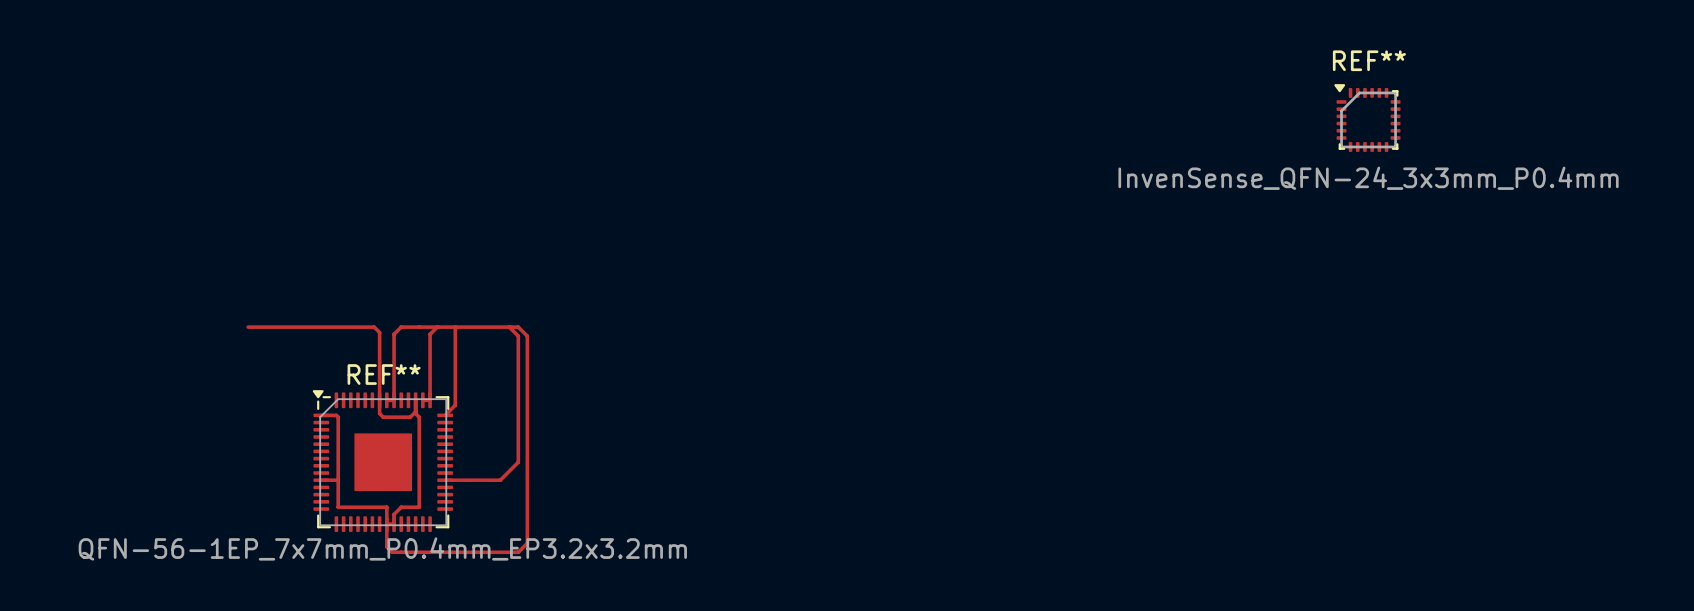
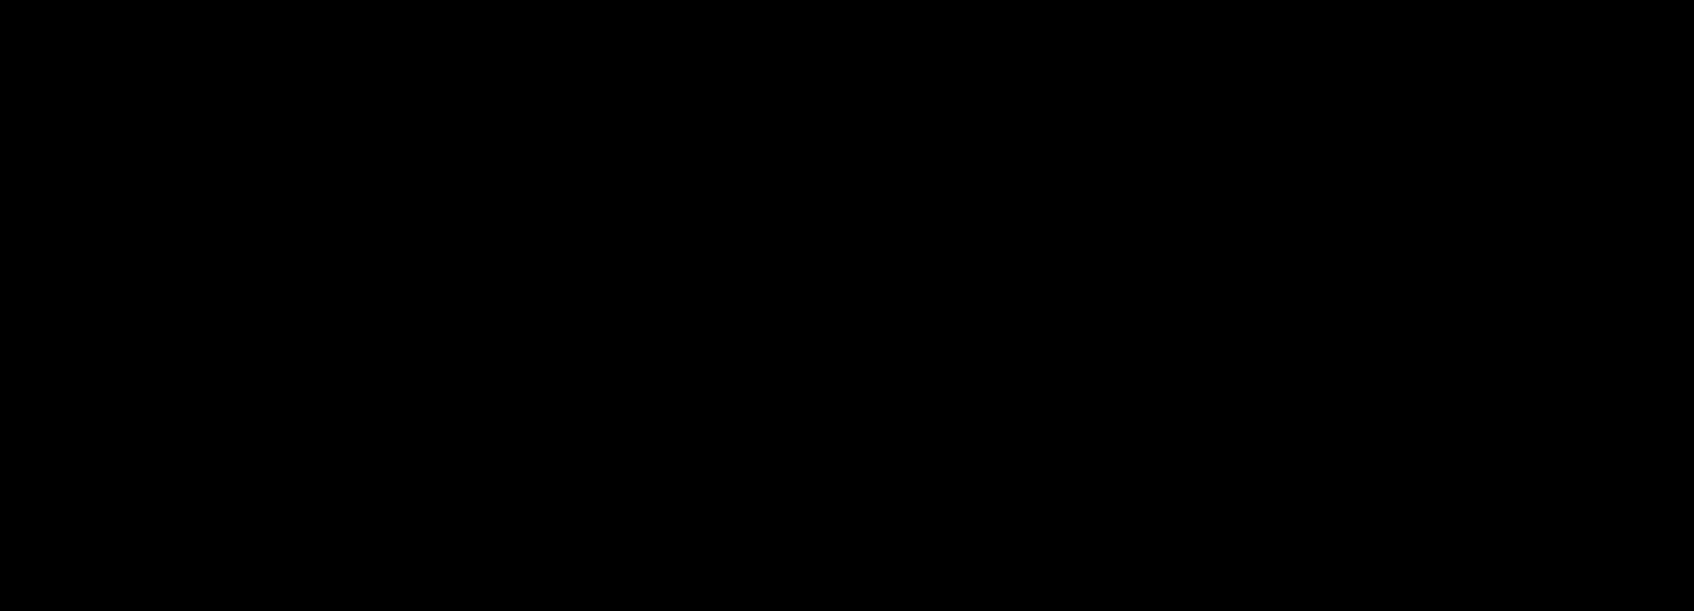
REF**: InvenSense_QFN-24_3x3mm_P0.4mm (1367, 118) -> none
track: (248, 327) (374, 327) (379, 332) (379, 413) (383, 417) (410, 417) (415, 411) -> none
track: (437, 327) (430, 334) (430, 400) (422, 400) -> none
track: (455, 327) (455, 405) (445, 415) -> none
track: (509, 327) (518, 336) (518, 462) (500, 480) (445, 480) -> none
track: (386, 400) (394, 400) (394, 334) (401, 327) (518, 327) (527, 336) (527, 543) (518, 552) (392, 552) (386, 546) (386, 507) (338, 507) (338, 417) (336, 415) (321, 415) -> none
track: (415, 400) (415, 413) (419, 417) (419, 507) (401, 507) (394, 514) (394, 524) (386, 524) -> none
REF**: QFN-56-1EP_7x7mm_P0.4mm_EP3.2x3.2mm (382, 461) -> none
track: (321, 480) (338, 480) -> none

